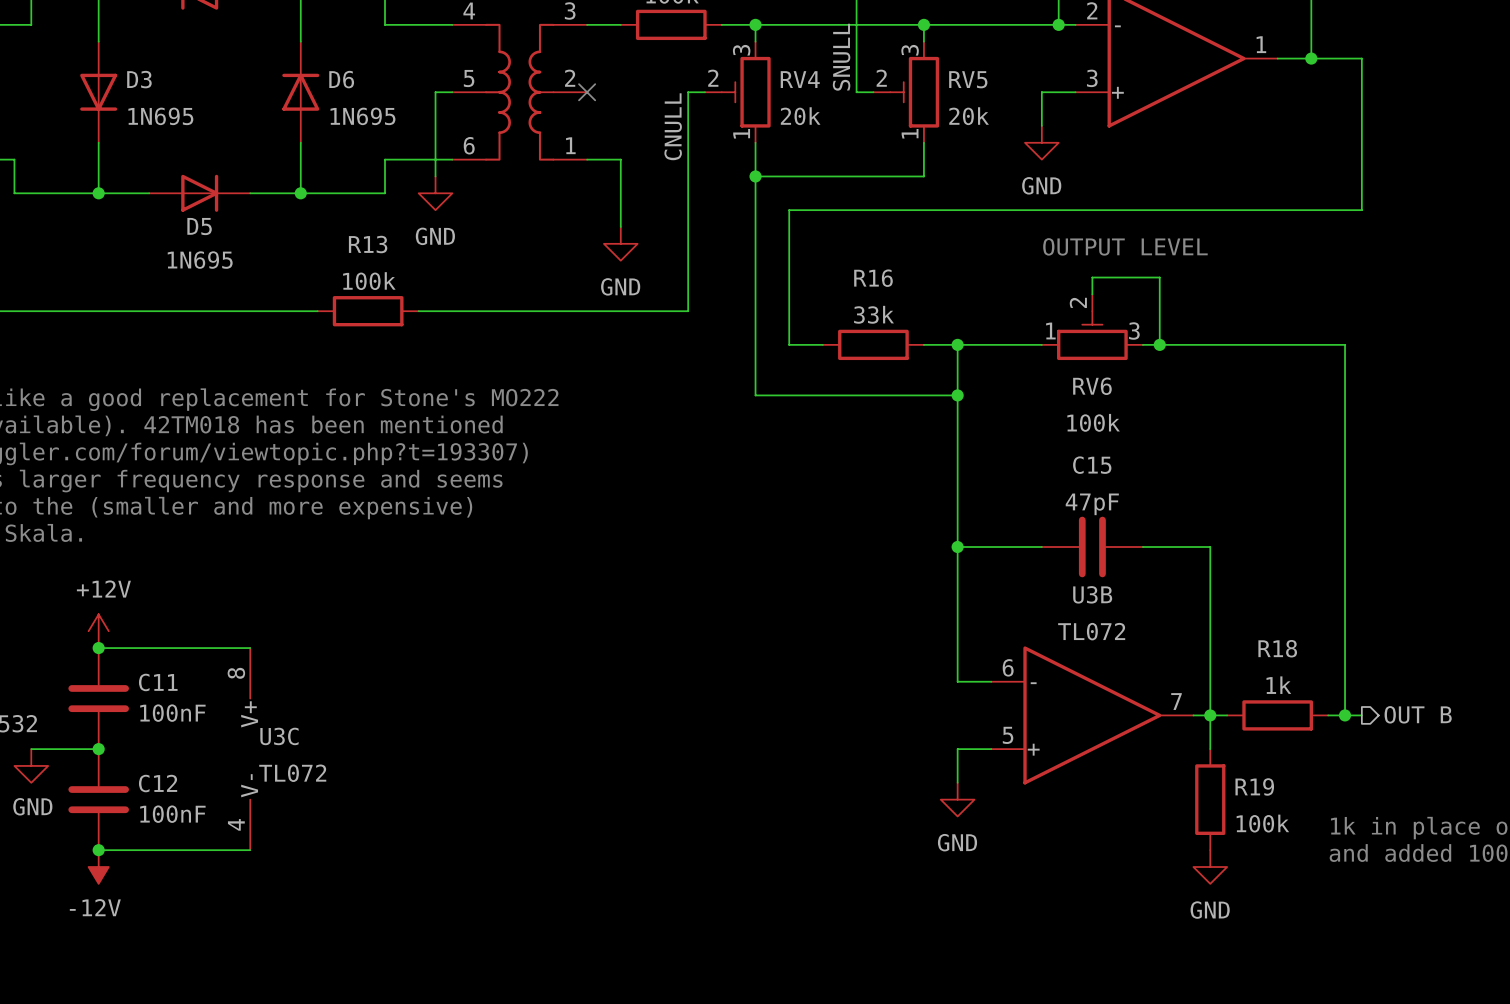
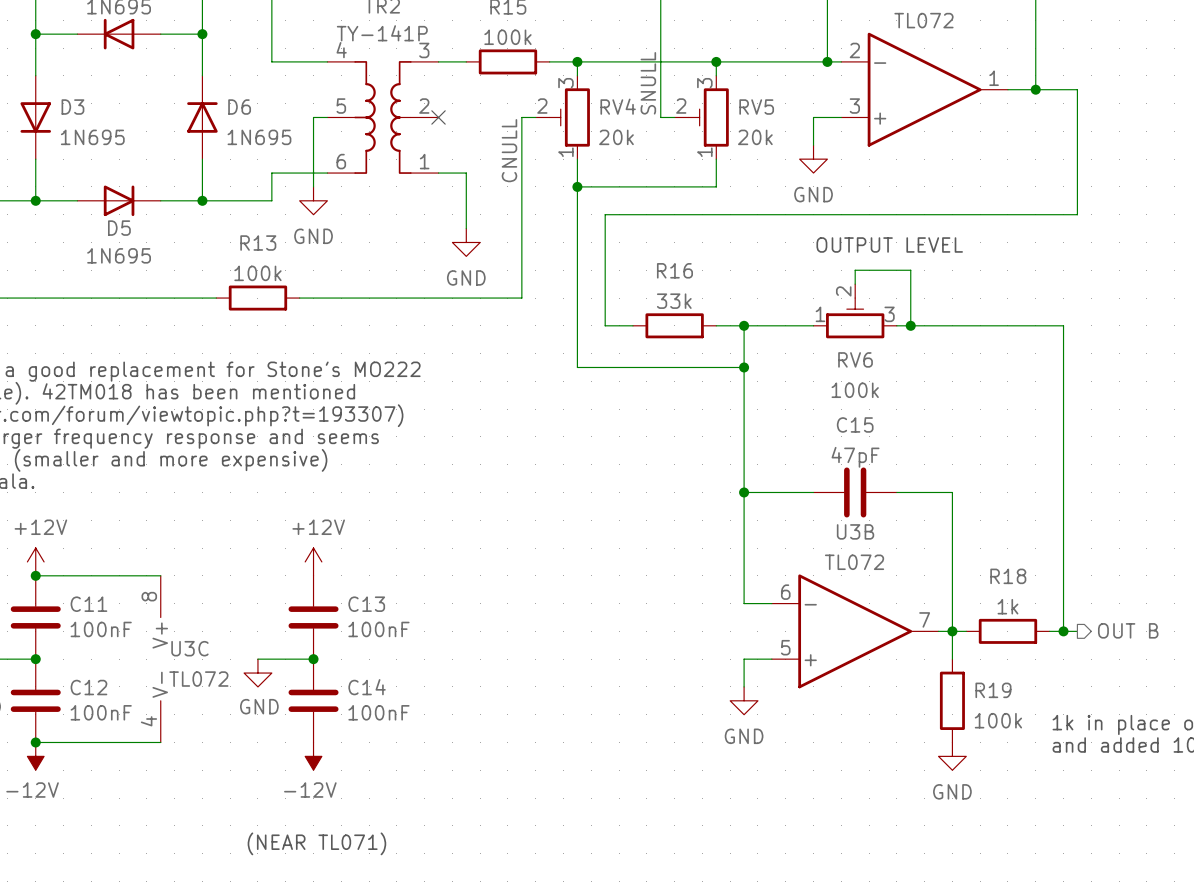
power symbol: none -> +12V (313, 561)
C13: none -> 100nF (313, 617)
wire: none -> (257, 659) (313, 659)
junction: none -> (313, 659)
power symbol: none -> GND (257, 673)
C14: none -> 100nF (313, 700)
power symbol: none -> -12V (313, 756)
text: none -> (NEAR TL071) (316, 843)

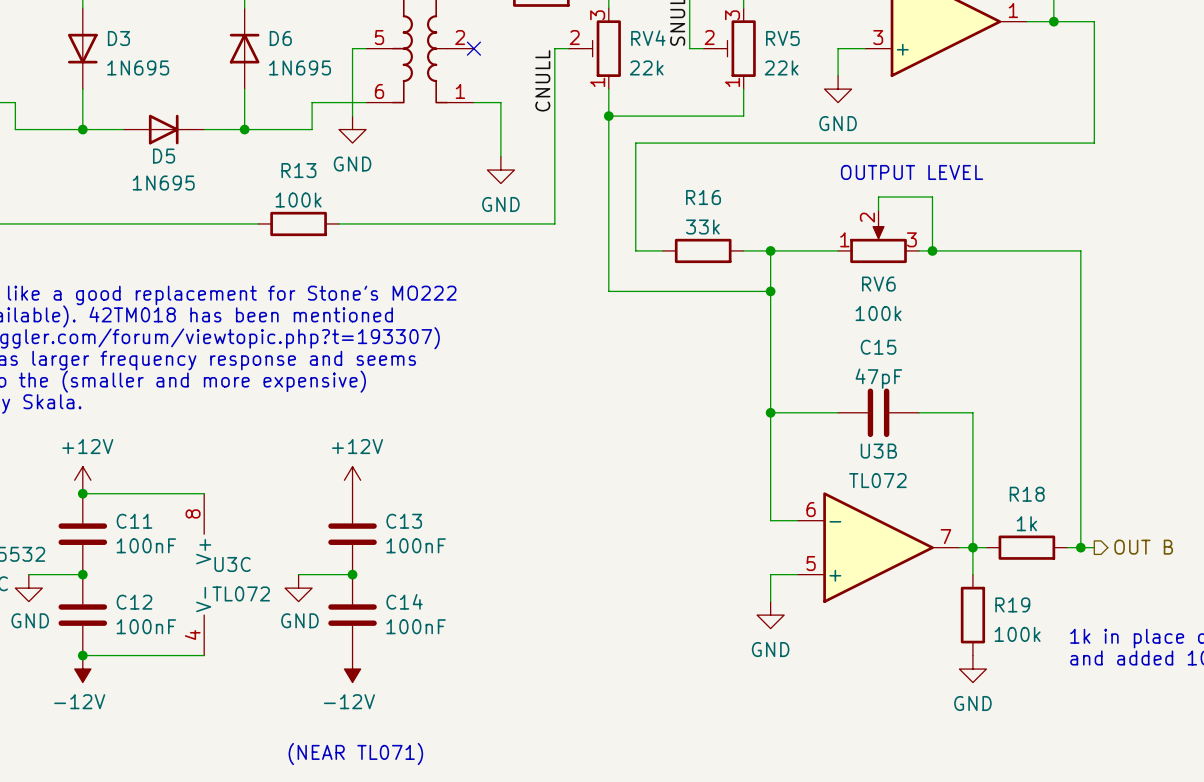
RV4 value: 20k (616, 137) -> 22k (646, 67)
RV5 value: 20k (755, 137) -> 22k (781, 67)
RV6 symbol: [813, 284, 897, 339] -> [838, 210, 919, 264]

